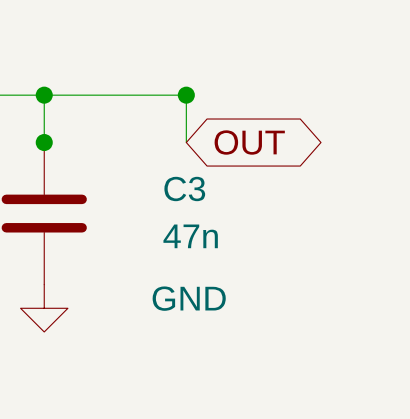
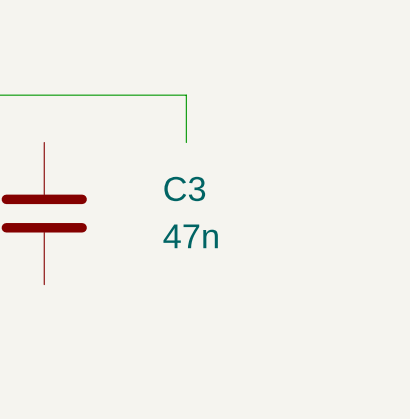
wire: (44, 95) (44, 142) -> none
junction: (44, 95) -> none
junction: (186, 95) -> none
junction: (44, 142) -> none
global label: OUT (249, 142) -> none
power symbol: GND (44, 308) -> none

